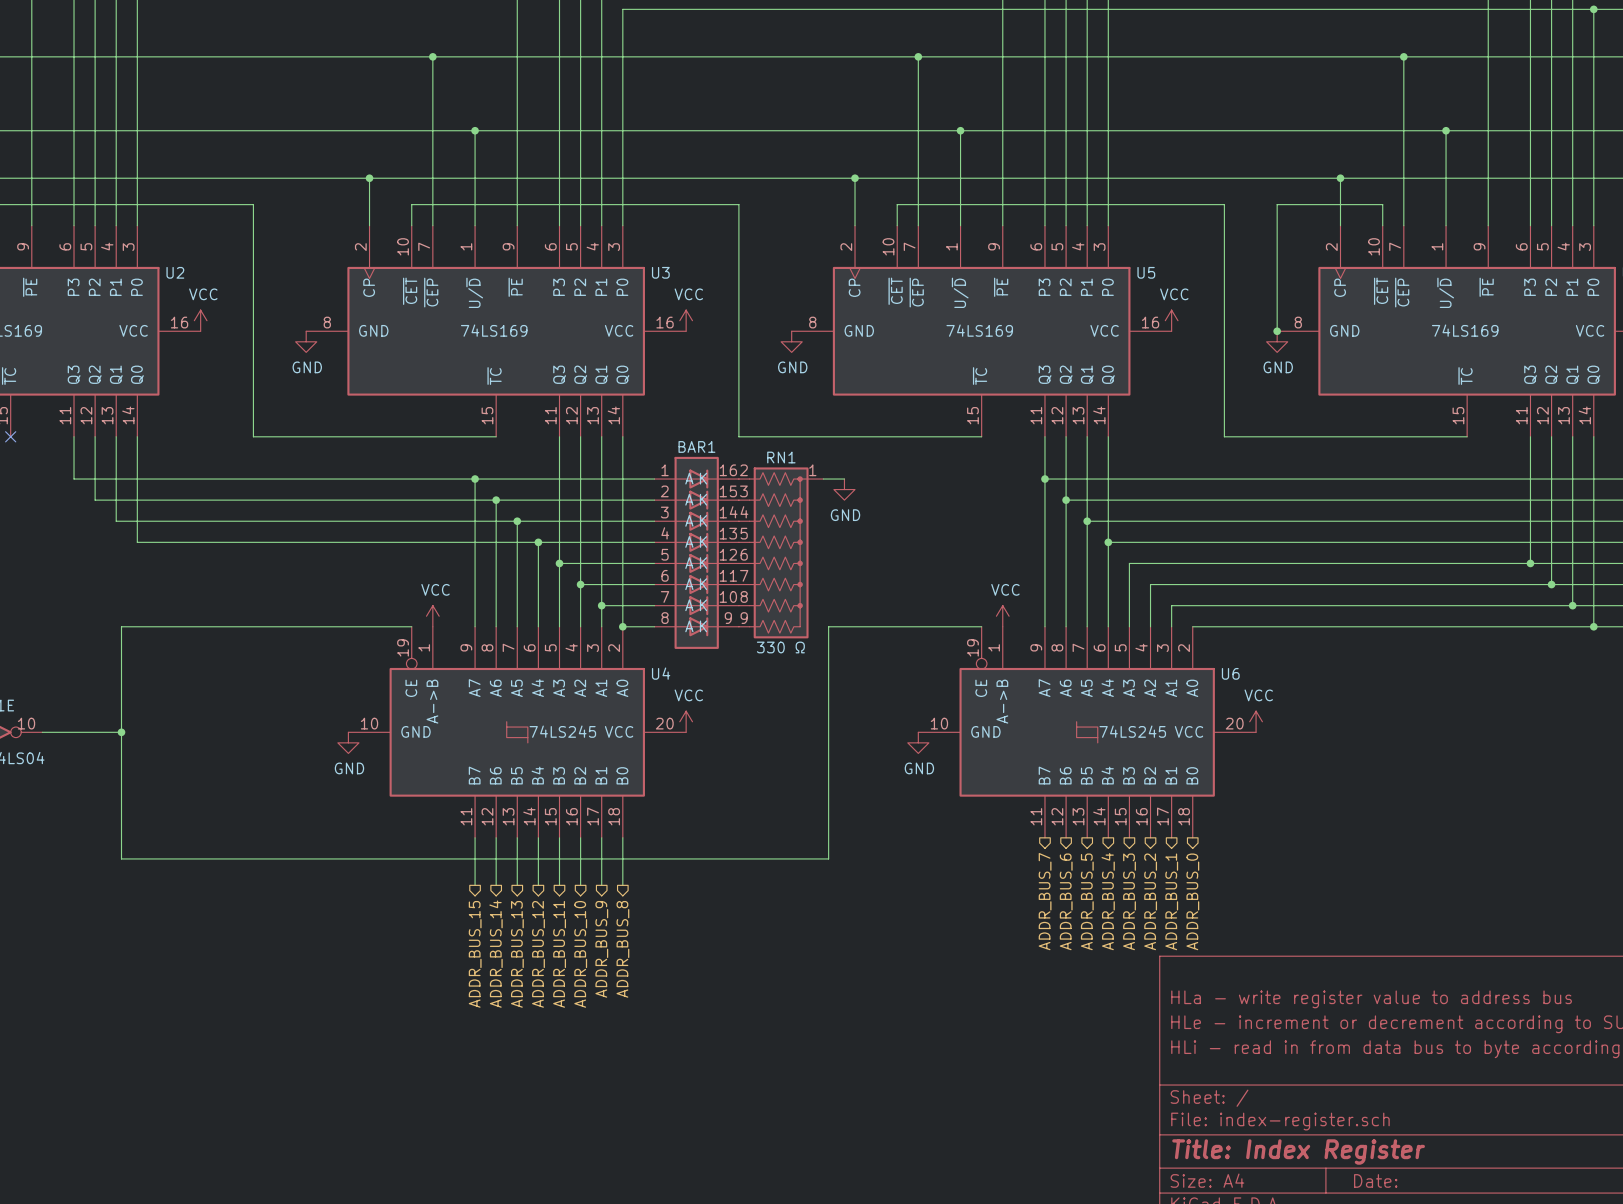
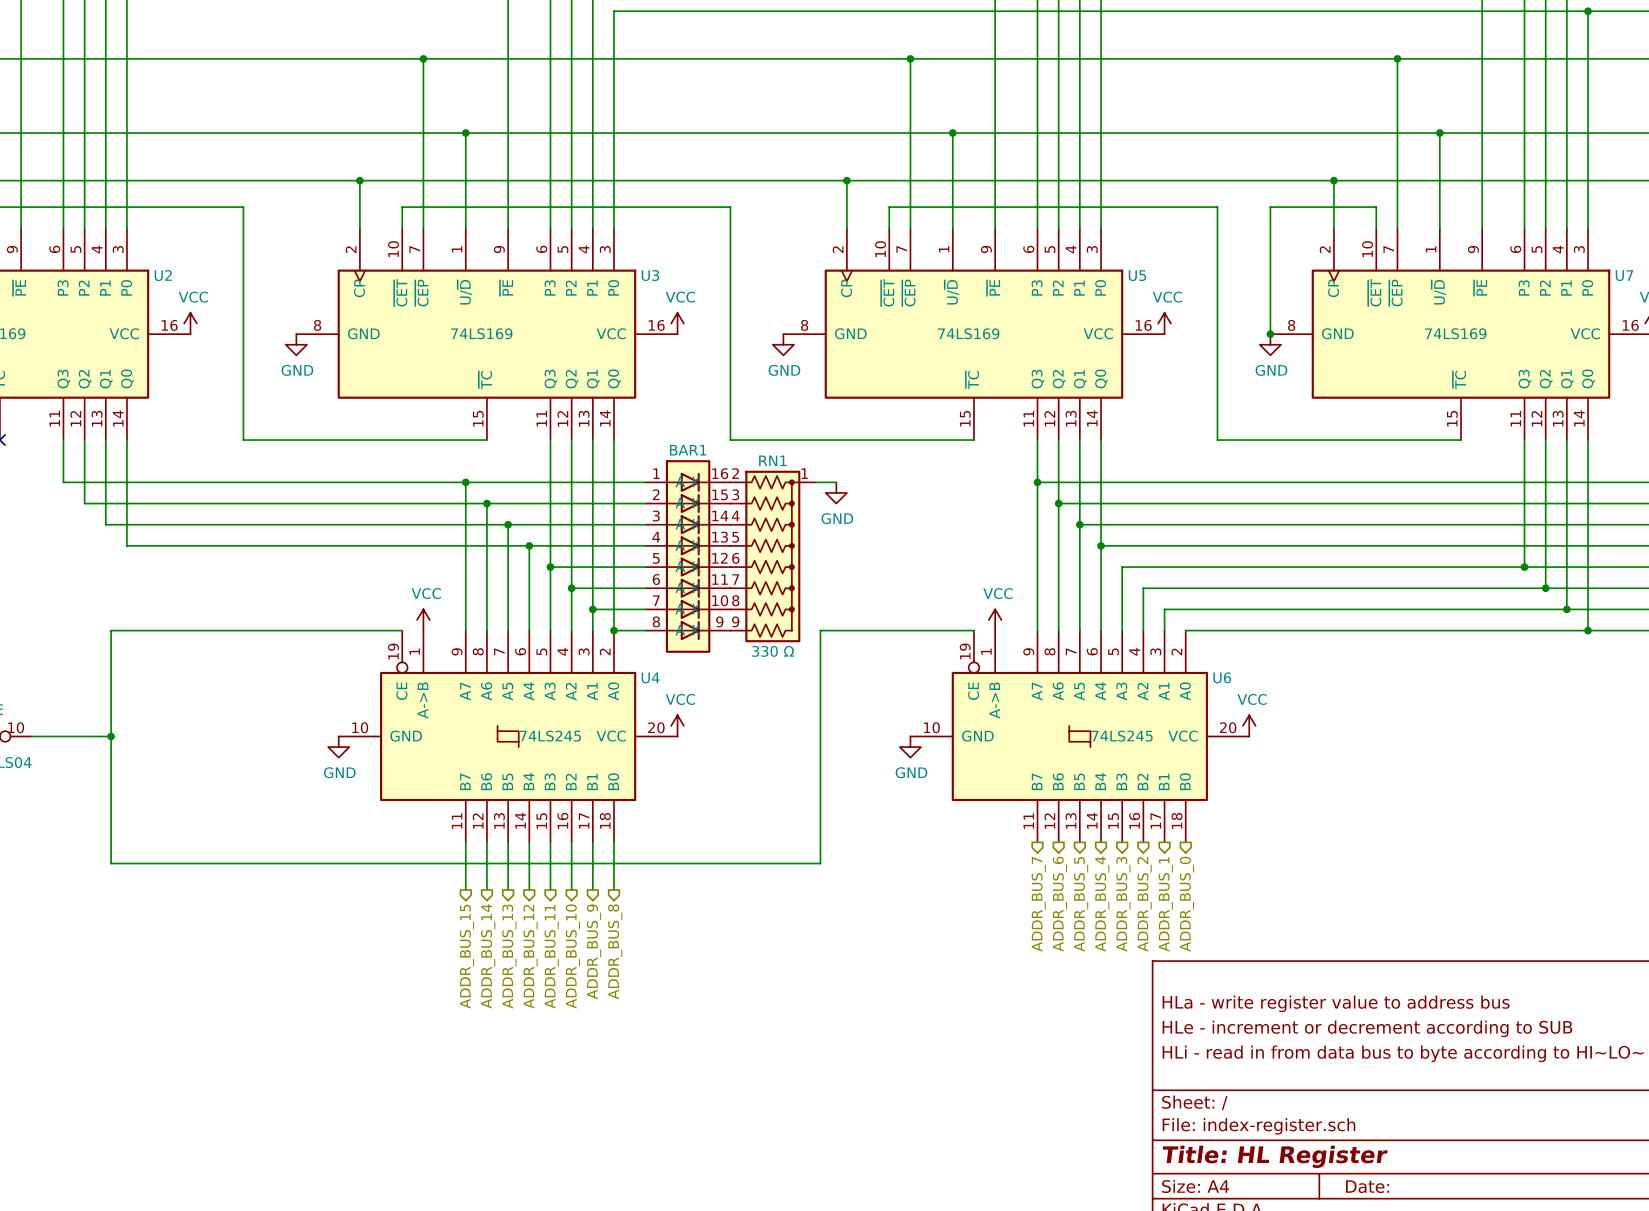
title block: Title: Index Register (1298, 1151) -> Title: HL Register (1275, 1156)

